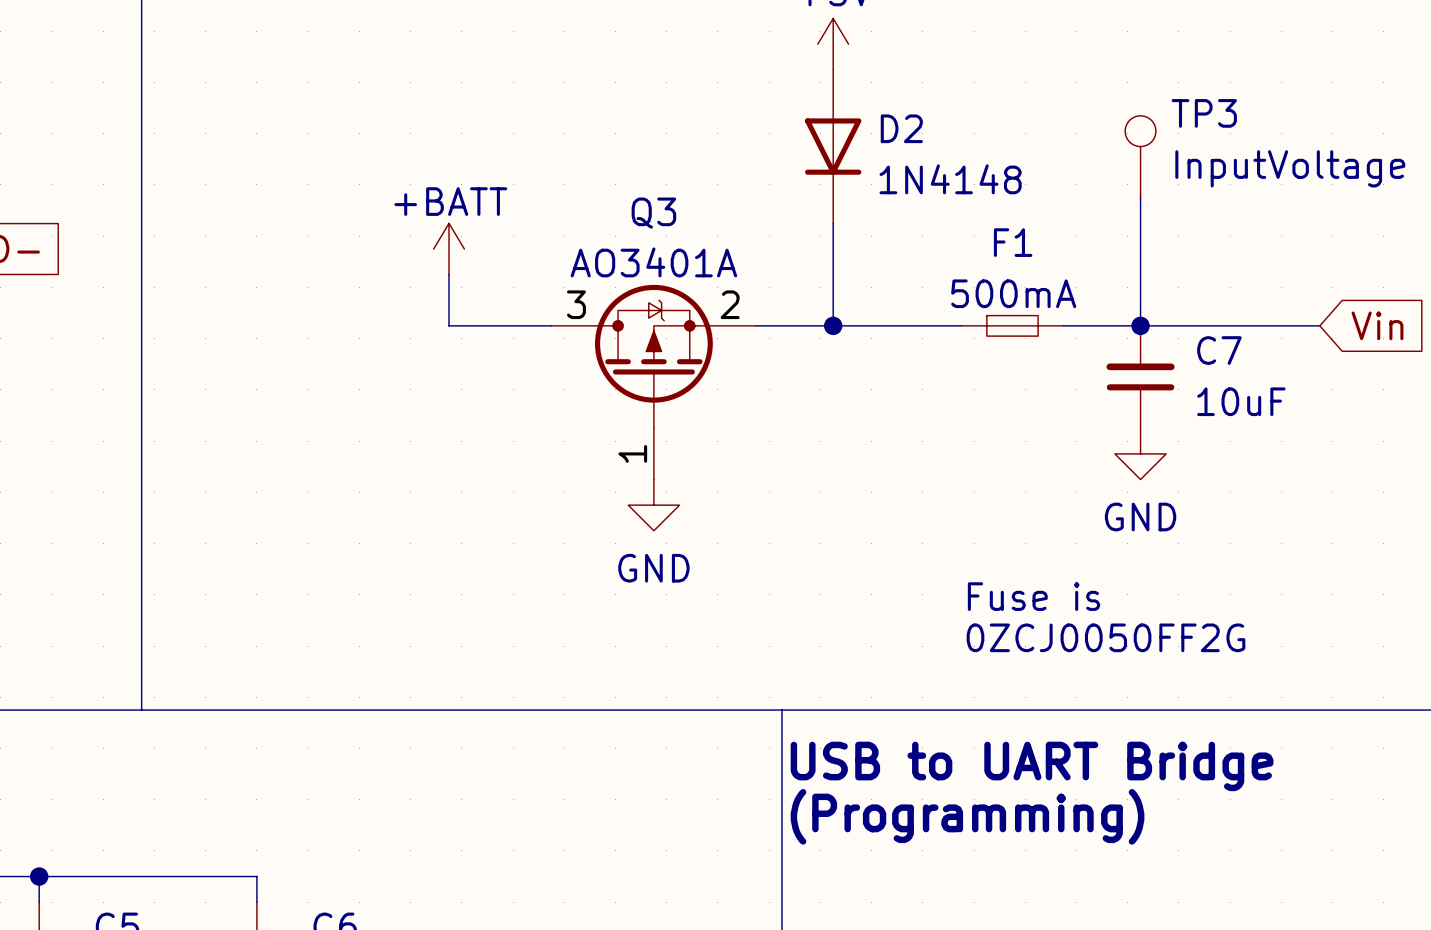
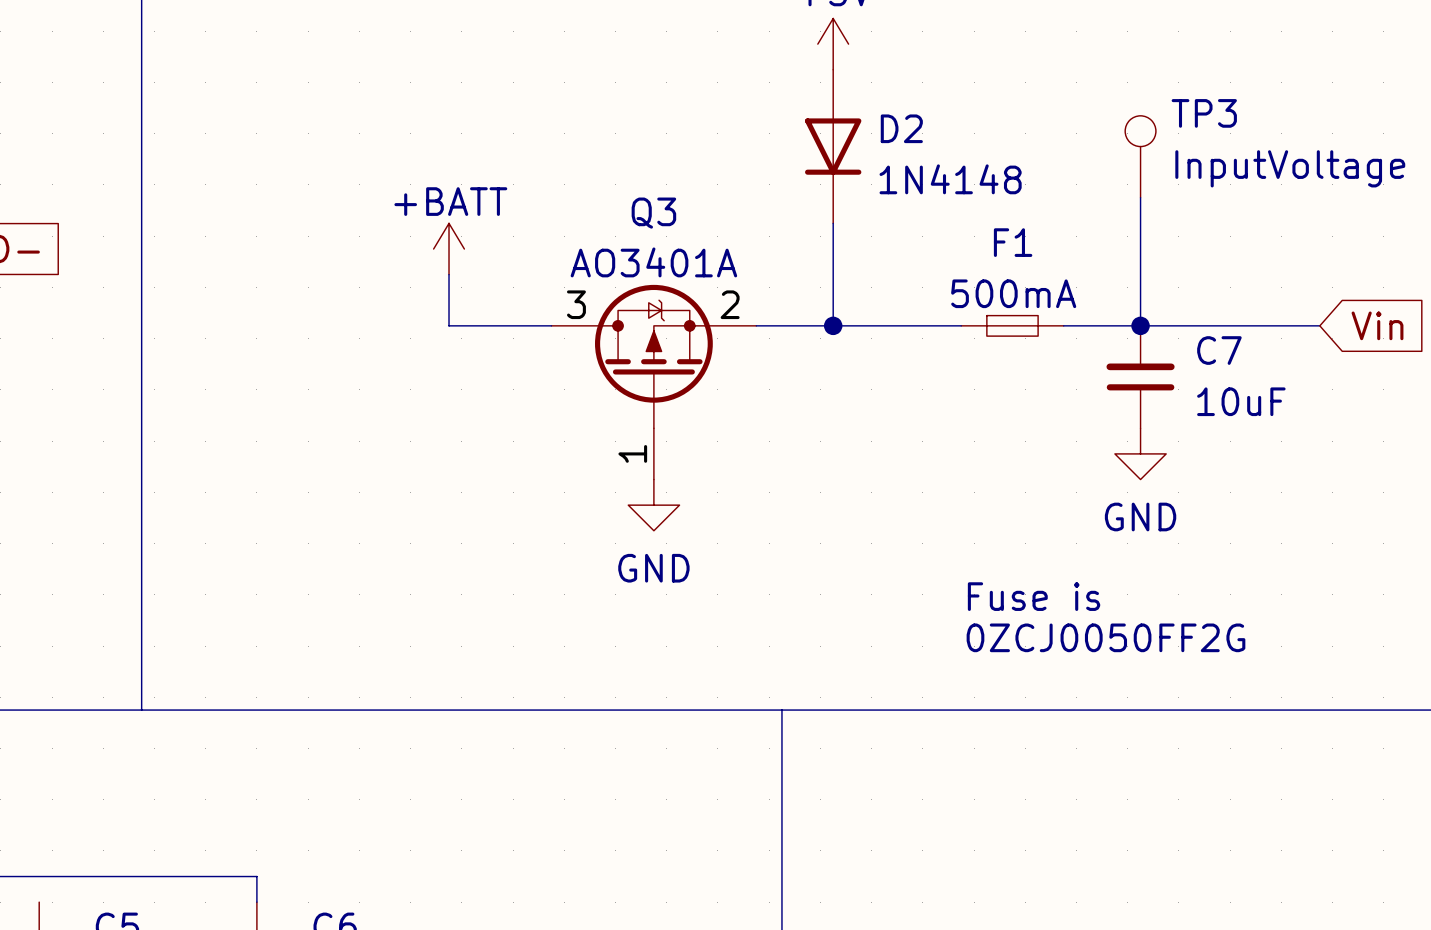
text: USB to UART Bridge (1032, 766) -> none
text: (Programming) (967, 816) -> none
wire: (39, 876) (39, 902) -> none
junction: (39, 876) -> none

